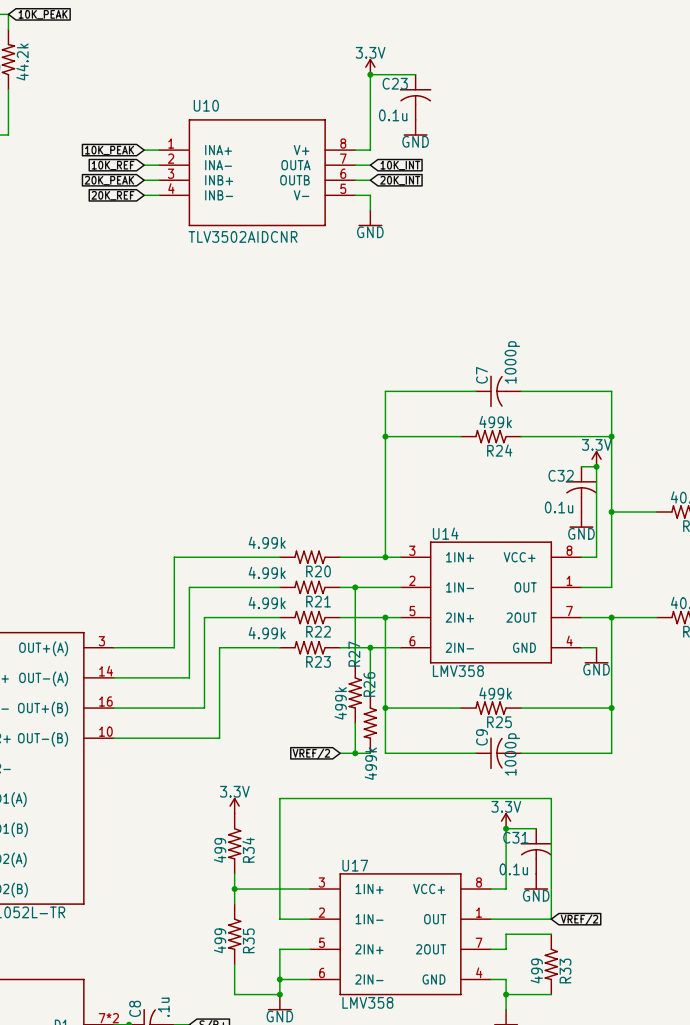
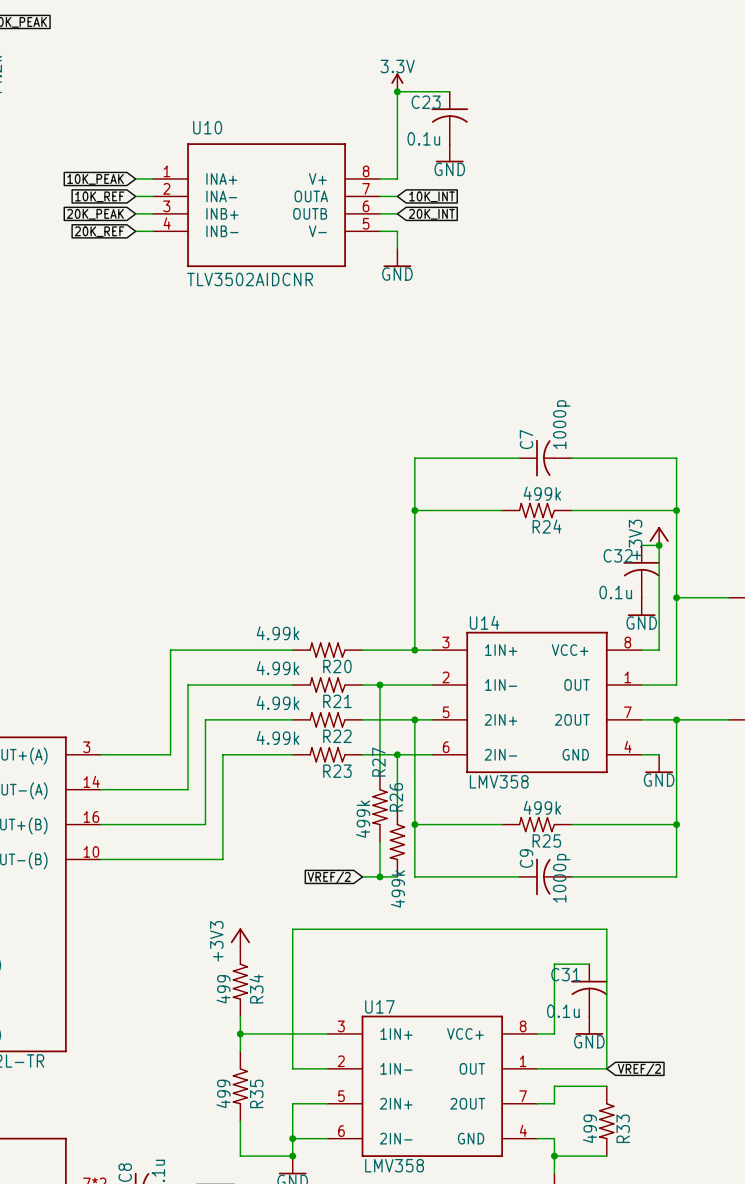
power symbol: 3.3V (596, 458) -> +3V3 (659, 536)
power symbol: 3.3V (234, 805) -> +3V3 (240, 937)
power symbol: 3.3V (506, 820) -> none
junction: (506, 828) -> none

